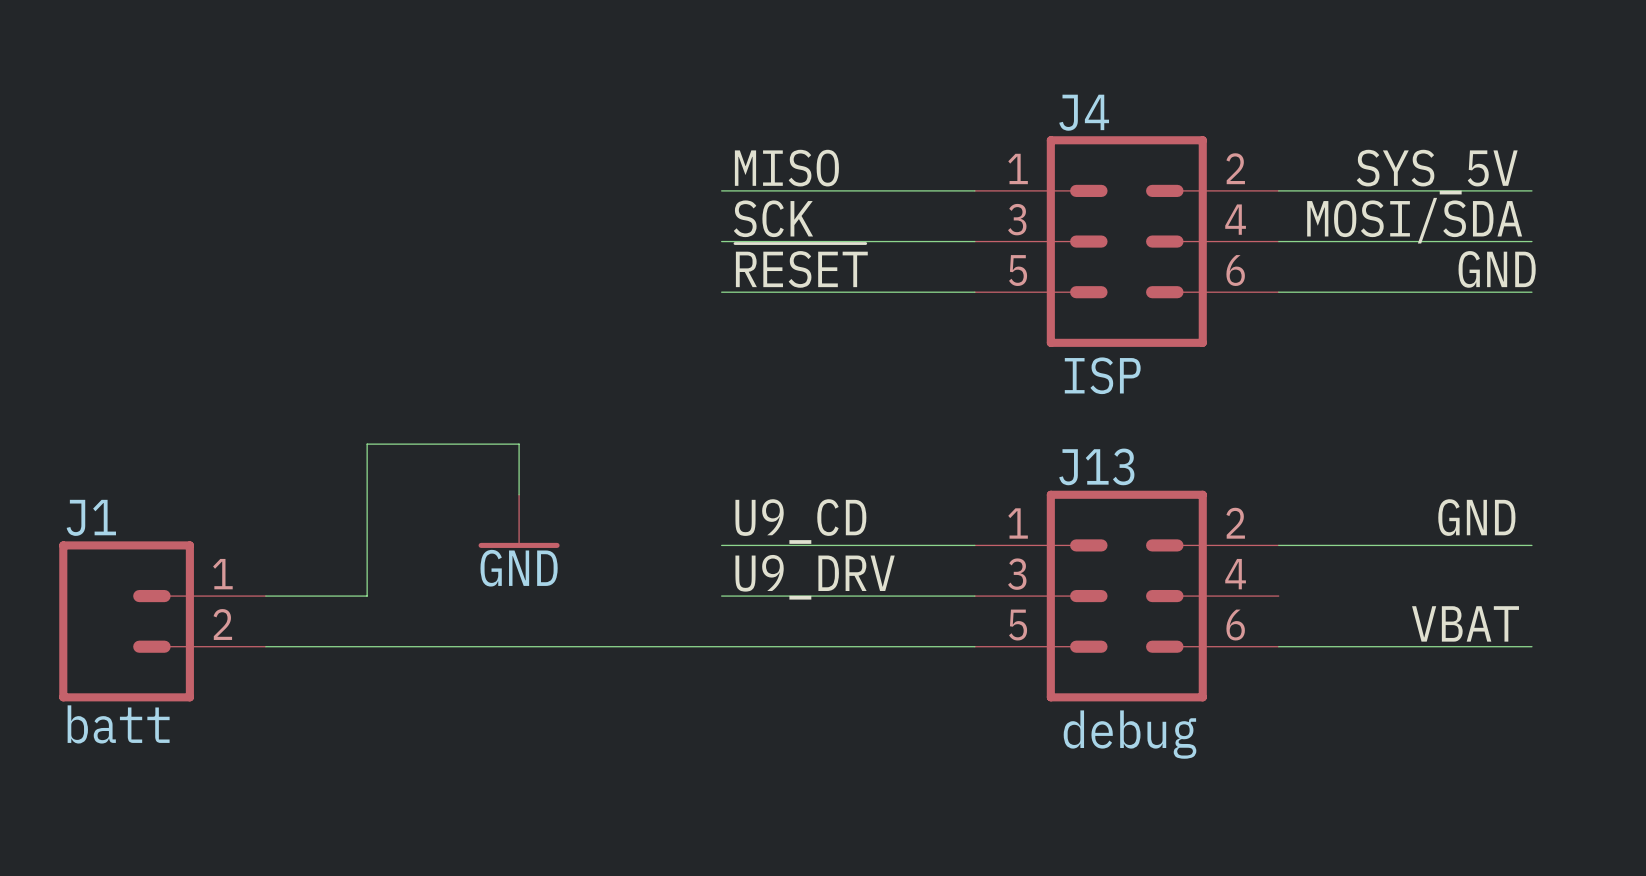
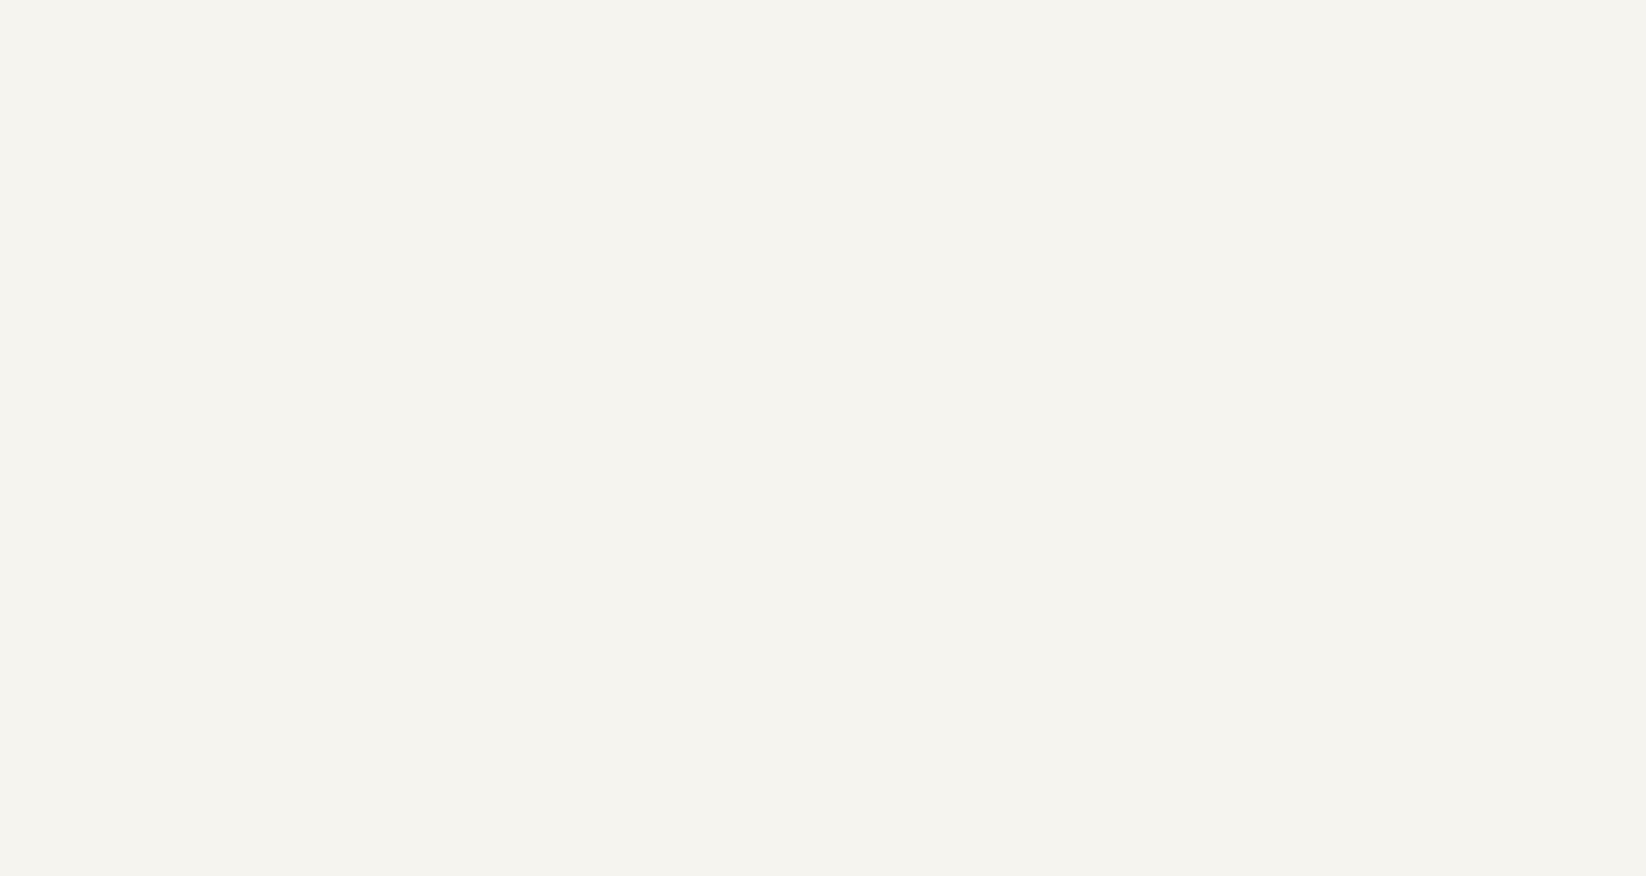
label: MISO (786, 168) -> none
label: SYS_5V (1437, 172) -> none
wire: (721, 190) (974, 190) -> none
wire: (1278, 190) (1531, 190) -> none
label: SCK (773, 218) -> none
label: MOSI/SDA (1414, 220) -> none
wire: (721, 241) (974, 241) -> none
J4: ISP (1126, 241) -> none
wire: (1278, 241) (1531, 241) -> none
label: ~{RESET} (801, 265) -> none
label: GND (1497, 269) -> none
wire: (721, 292) (974, 292) -> none
wire: (1278, 292) (1531, 292) -> none
wire: (519, 494) (519, 444) (367, 444) (367, 596) (265, 596) -> none
label: GND (1476, 517) -> none
power symbol: GND (519, 521) -> none
label: U9_CD (800, 521) -> none
wire: (721, 545) (974, 545) -> none
wire: (1278, 545) (1531, 545) -> none
label: U9_DRV (815, 577) -> none
wire: (721, 596) (974, 596) -> none
J13: debug (1126, 596) -> none
J1: batt (162, 621) -> none
label: VBAT (1465, 623) -> none
wire: (265, 646) (974, 646) -> none
wire: (1278, 646) (1531, 646) -> none

